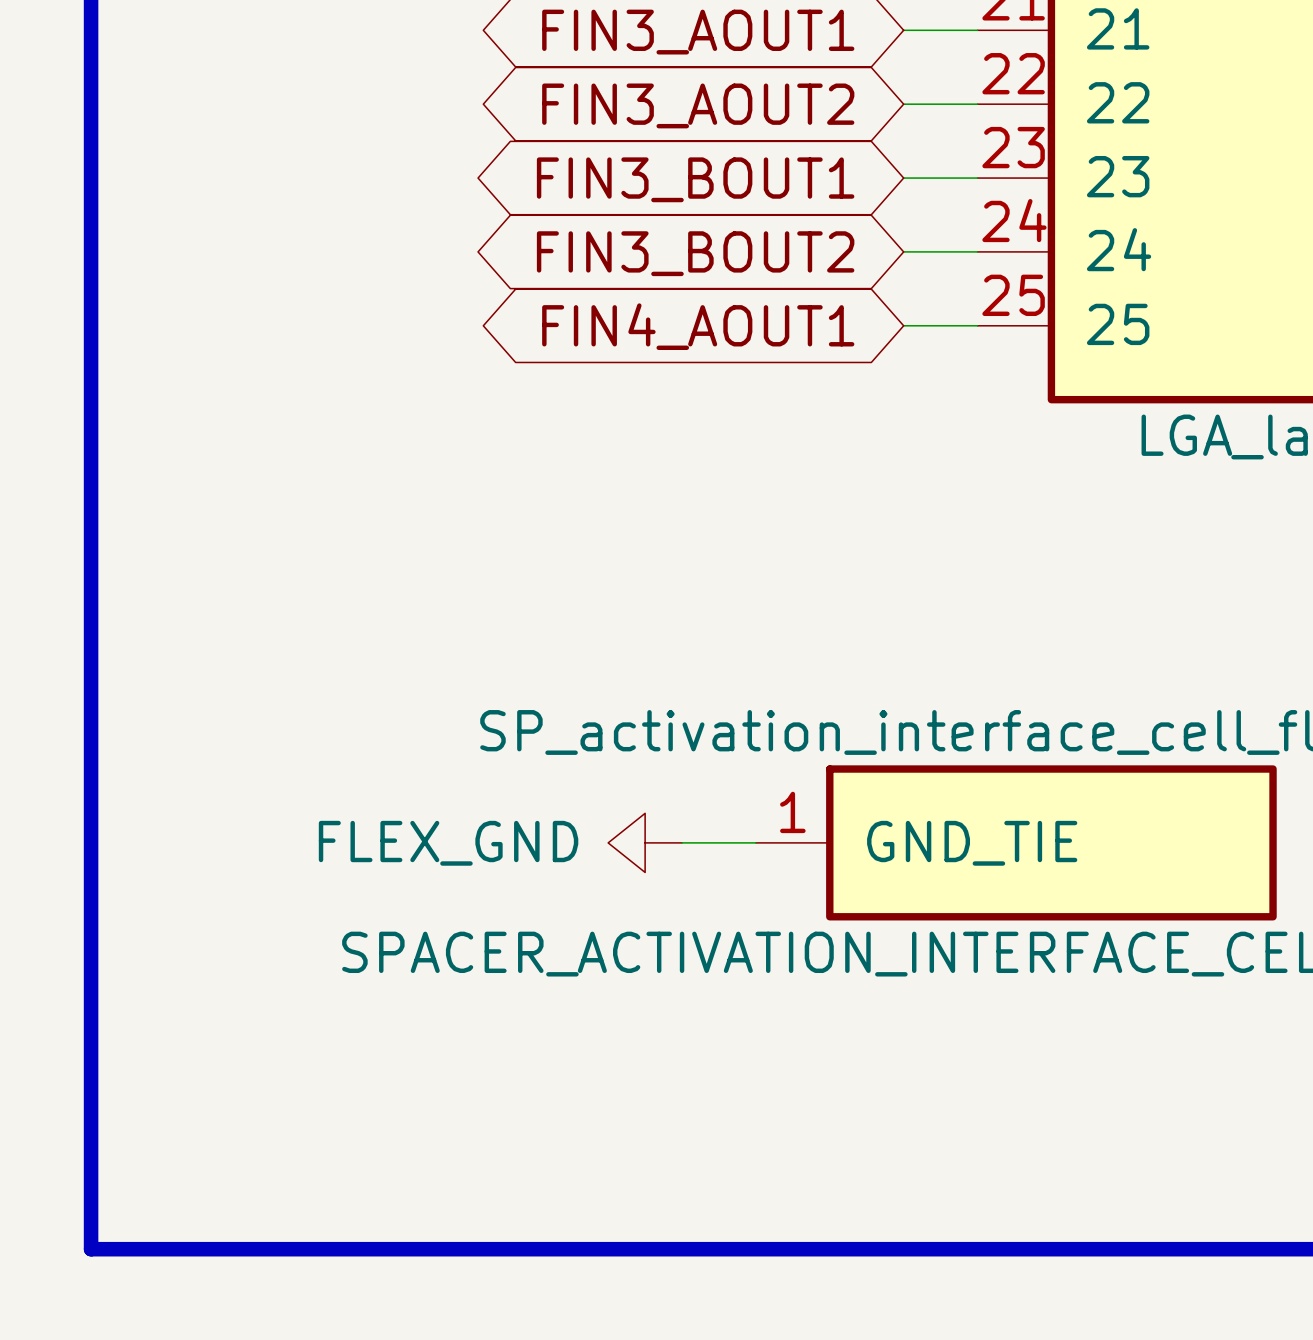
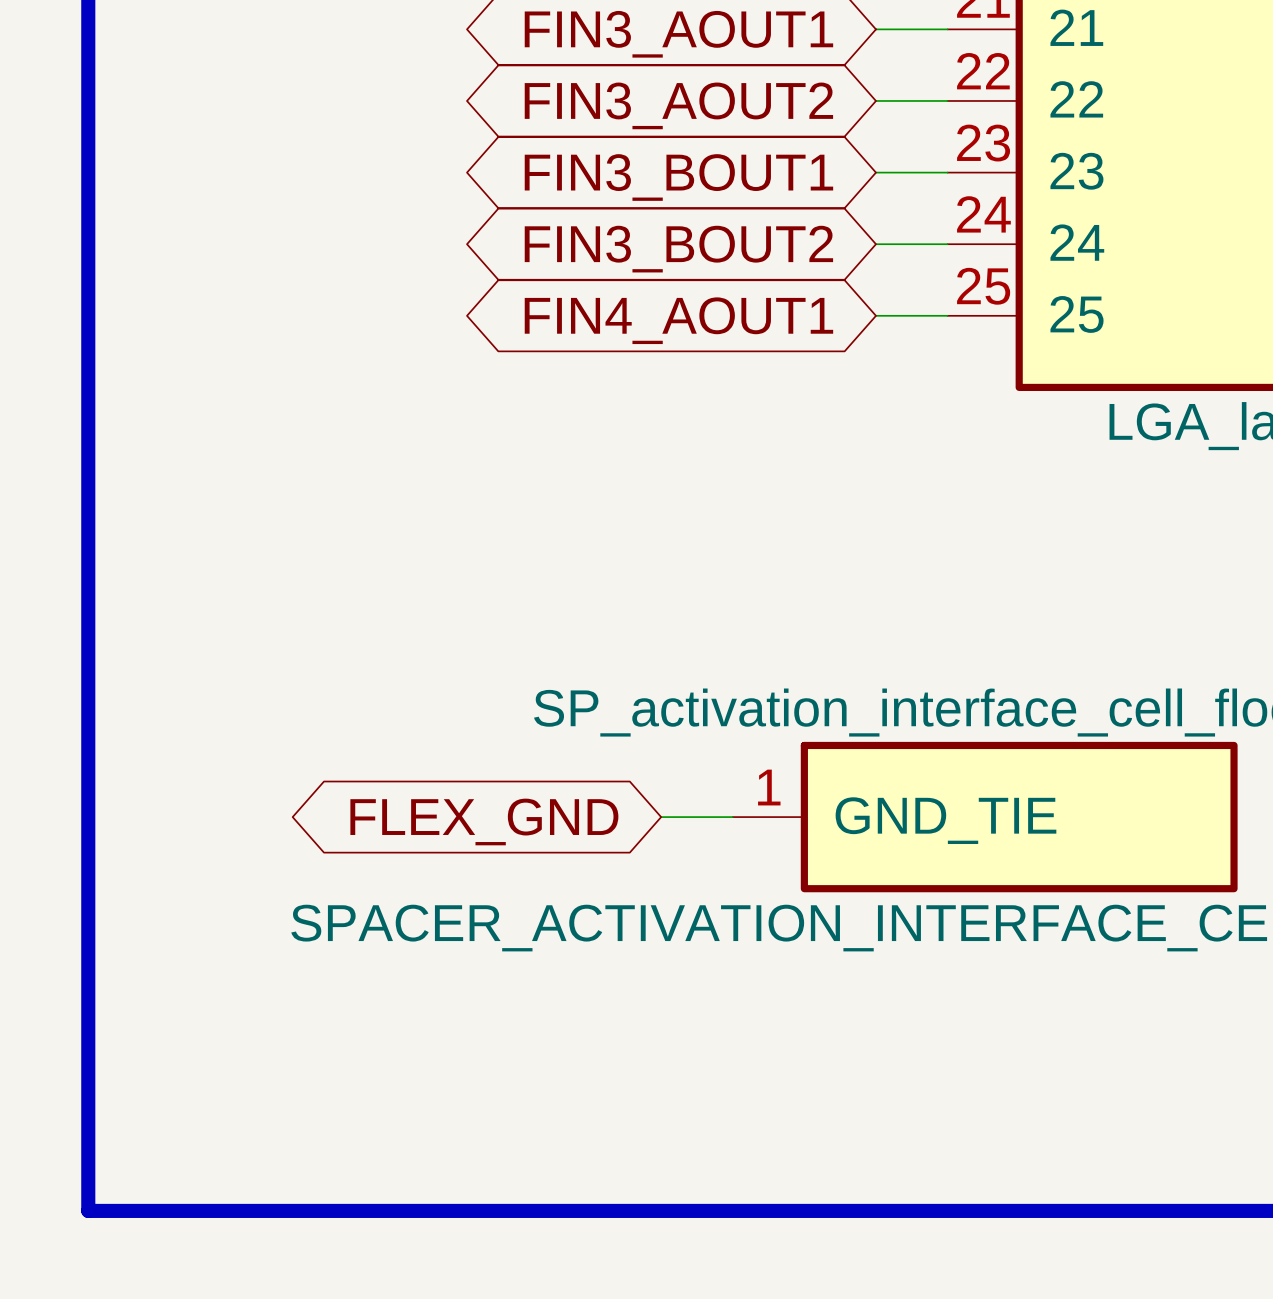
power symbol: FLEX_GND (645, 842) -> none
global label: none -> FLEX_GND (484, 821)

